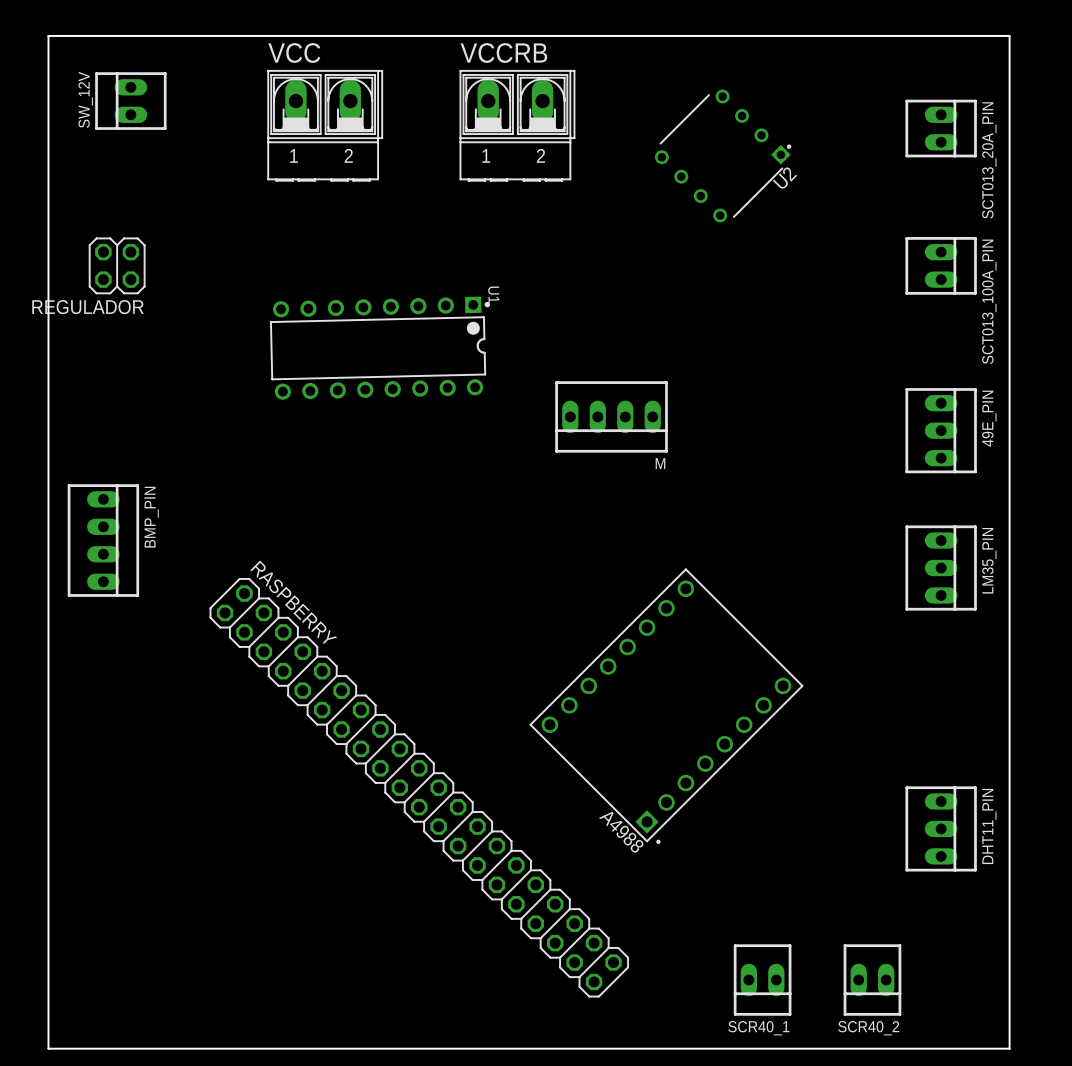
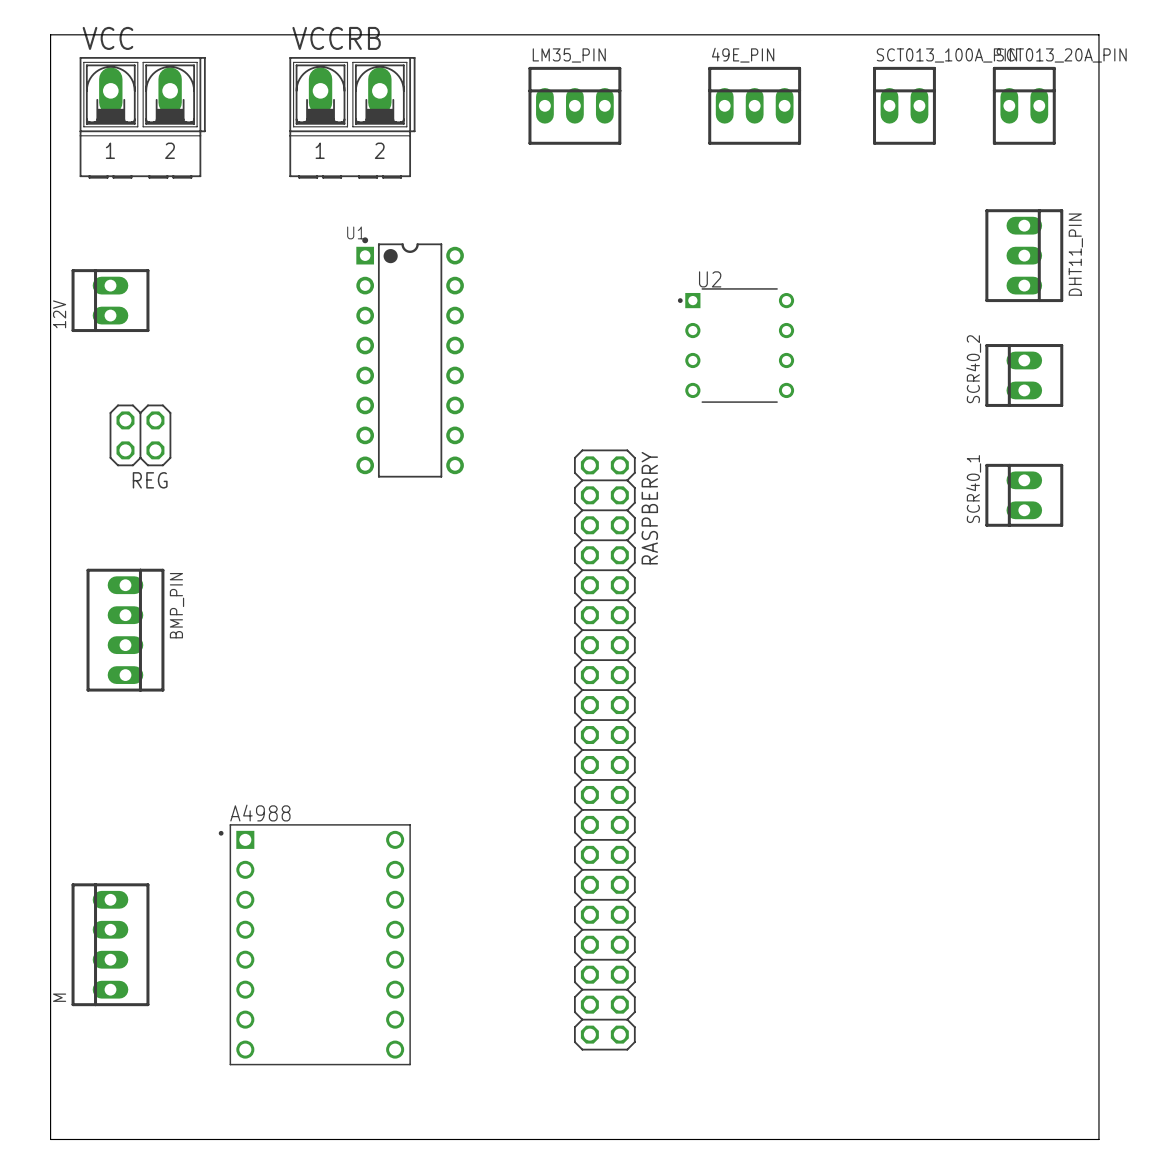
SW_12V: (130, 101) -> none
VCC position: (325, 125) -> (142, 117)
VCCRB position: (517, 125) -> (352, 117)
SCT013_20A_PIN rotation: 0° (941, 128) -> 90° counterclockwise (1024, 105)
U2 rotation: 0° (723, 156) -> 135° counterclockwise (736, 345)
U2 position: (723, 156) -> (736, 345)
REGULADOR: (117, 265) -> none
SCT013_100A_PIN rotation: 0° (941, 265) -> 90° counterclockwise (904, 105)
SCT013_100A_PIN position: (941, 265) -> (904, 105)
12V: none -> (110, 300)
U1 rotation: 0° (380, 348) -> 88.7° counterclockwise (410, 357)
REG: none -> (140, 435)
M: (611, 416) -> none
49E_PIN rotation: 0° (941, 430) -> 90° counterclockwise (754, 105)
49E_PIN position: (941, 430) -> (754, 105)
BMP_PIN position: (103, 540) -> (125, 630)
LM35_PIN rotation: 0° (941, 568) -> 90° counterclockwise (574, 105)
LM35_PIN position: (941, 568) -> (574, 105)
RASPBERRY: none -> (604, 749)
A4988 rotation: 0° (666, 706) -> 135° clockwise (314, 944)
A4988 position: (666, 706) -> (314, 944)
RASPBERRY: (419, 787) -> none
DHT11_PIN position: (941, 828) -> (1024, 255)
M: none -> (110, 944)
SCR40_1 rotation: 0° (762, 980) -> 90° clockwise (1024, 495)
SCR40_1 position: (762, 980) -> (1024, 495)
SCR40_2 rotation: 0° (872, 980) -> 90° clockwise (1024, 375)
SCR40_2 position: (872, 980) -> (1024, 375)

